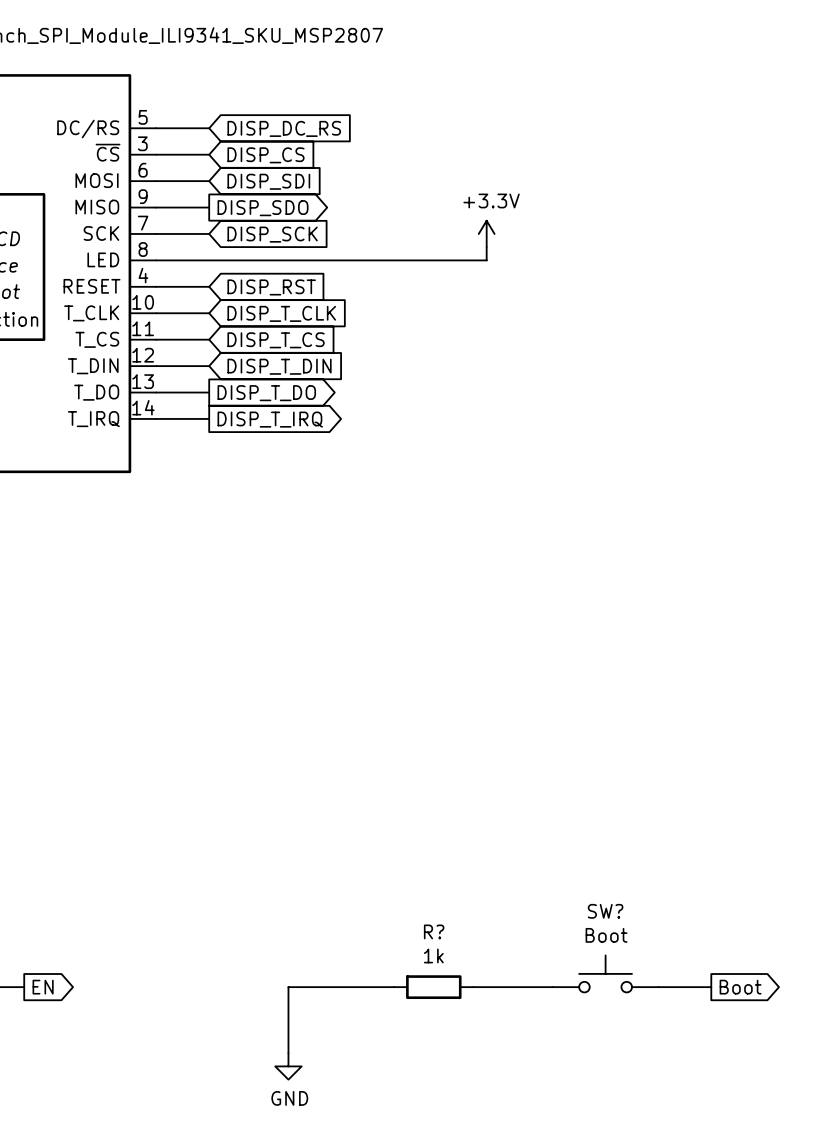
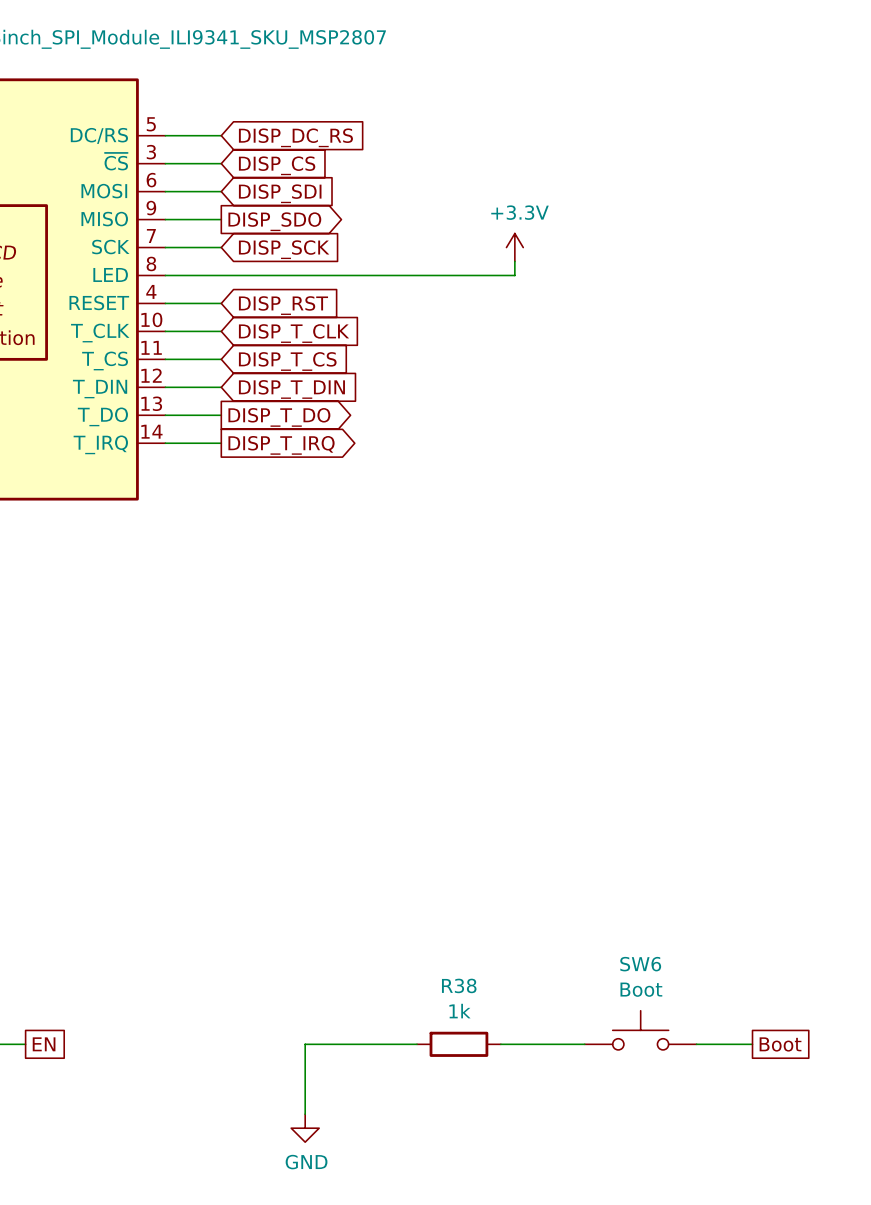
SW? name: SW? (605, 911) -> SW6 (640, 964)
R? name: R? (434, 931) -> R38 (459, 985)
global label shape: output (43, 987) -> passive (44, 1044)
global label shape: output (740, 987) -> passive (780, 1044)

